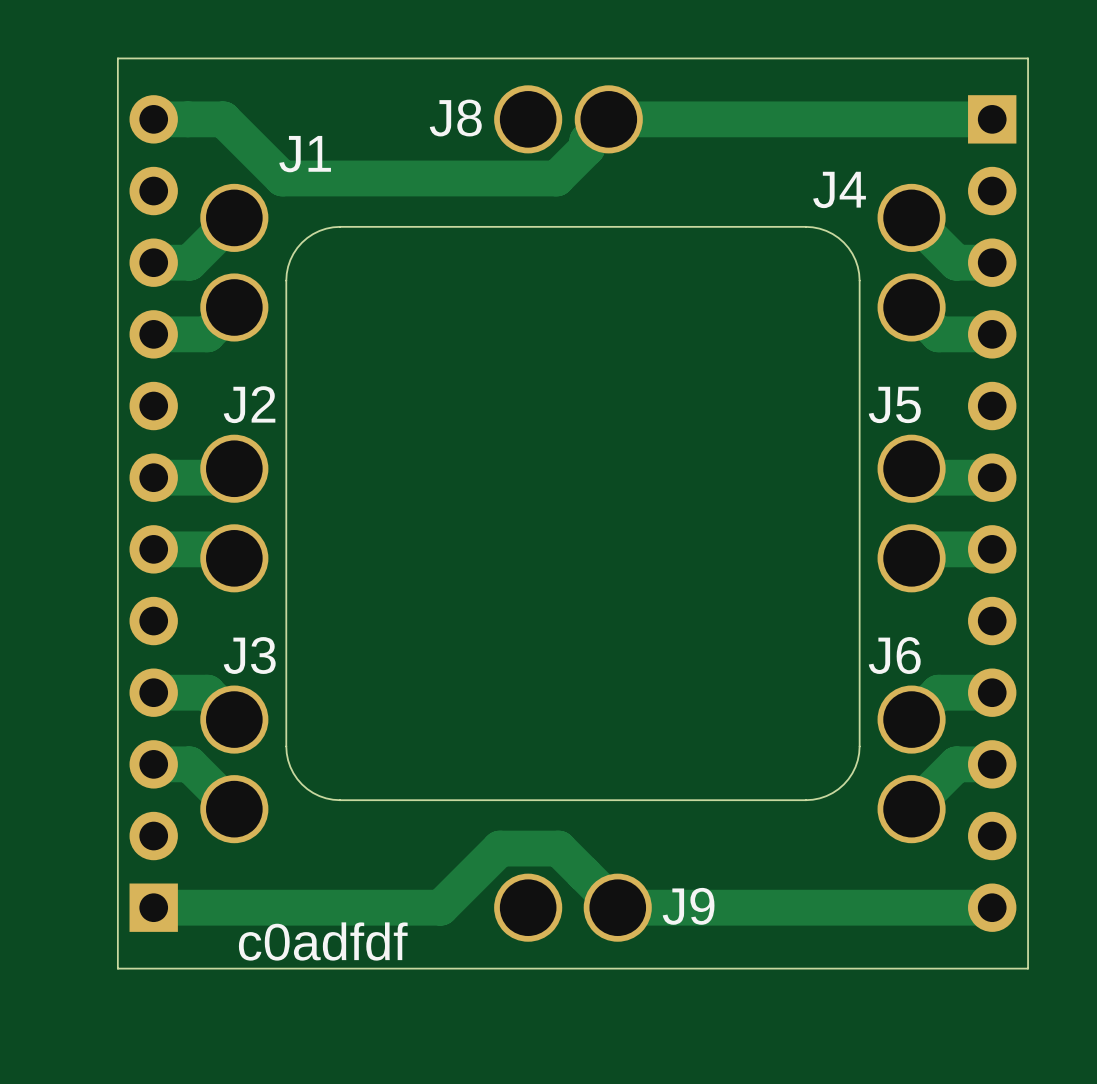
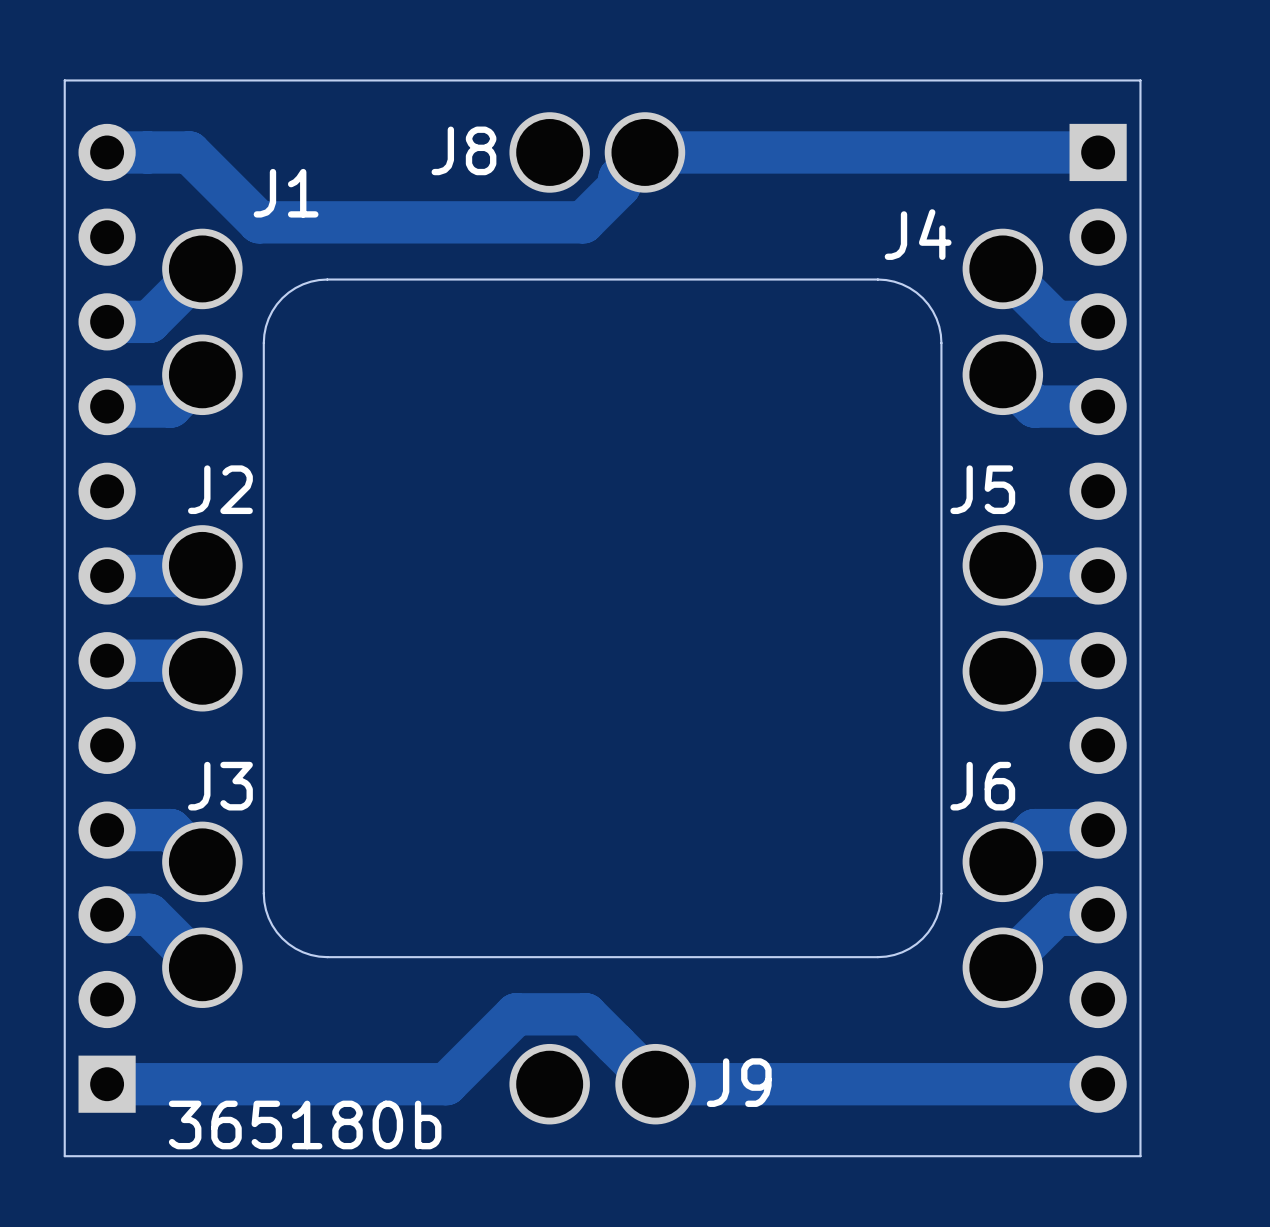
text: c0adfdf (323, 941) -> 365180b (305, 1124)

